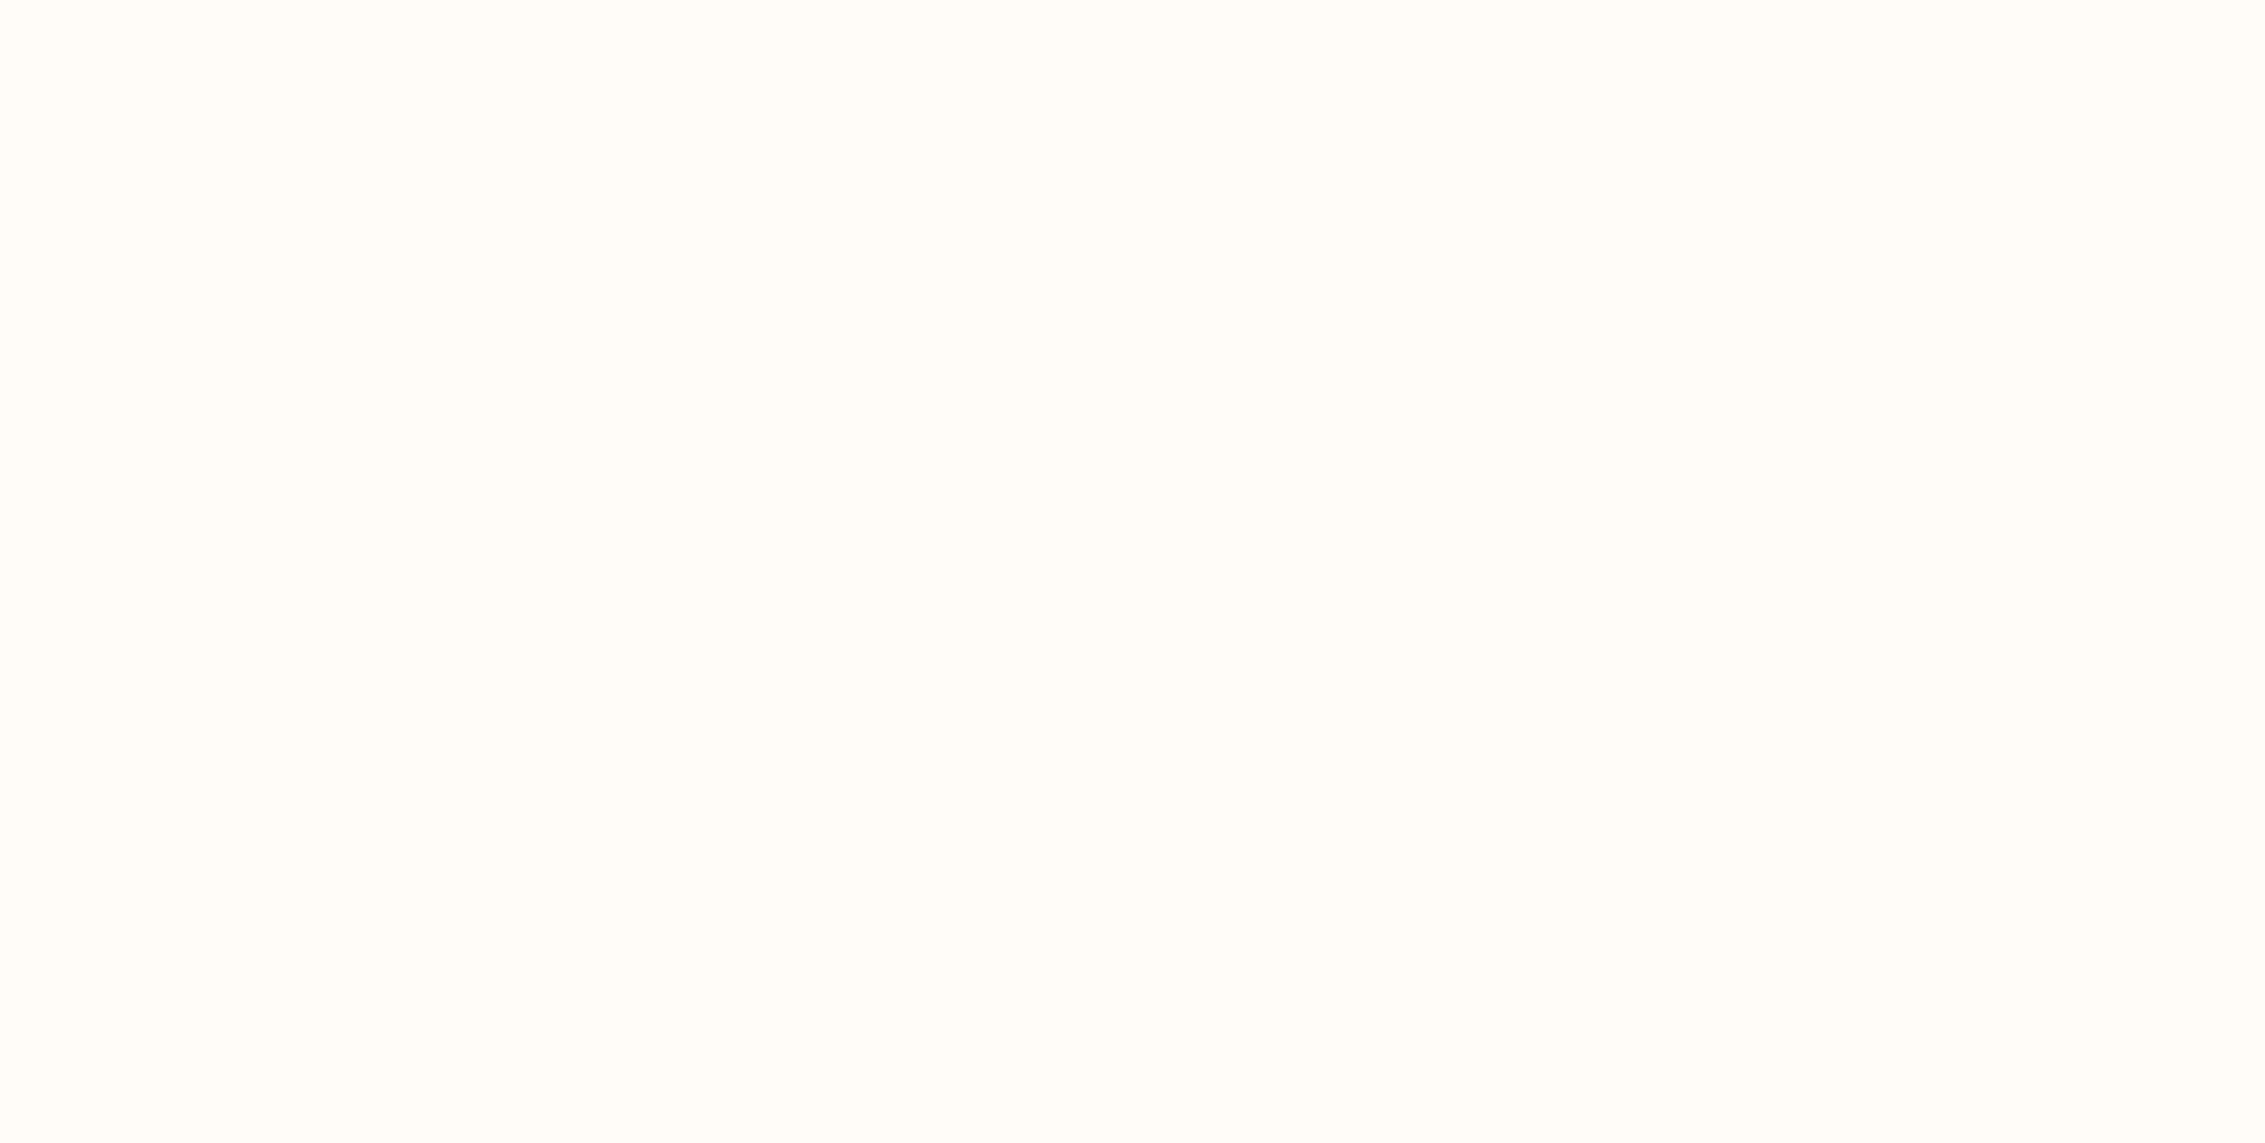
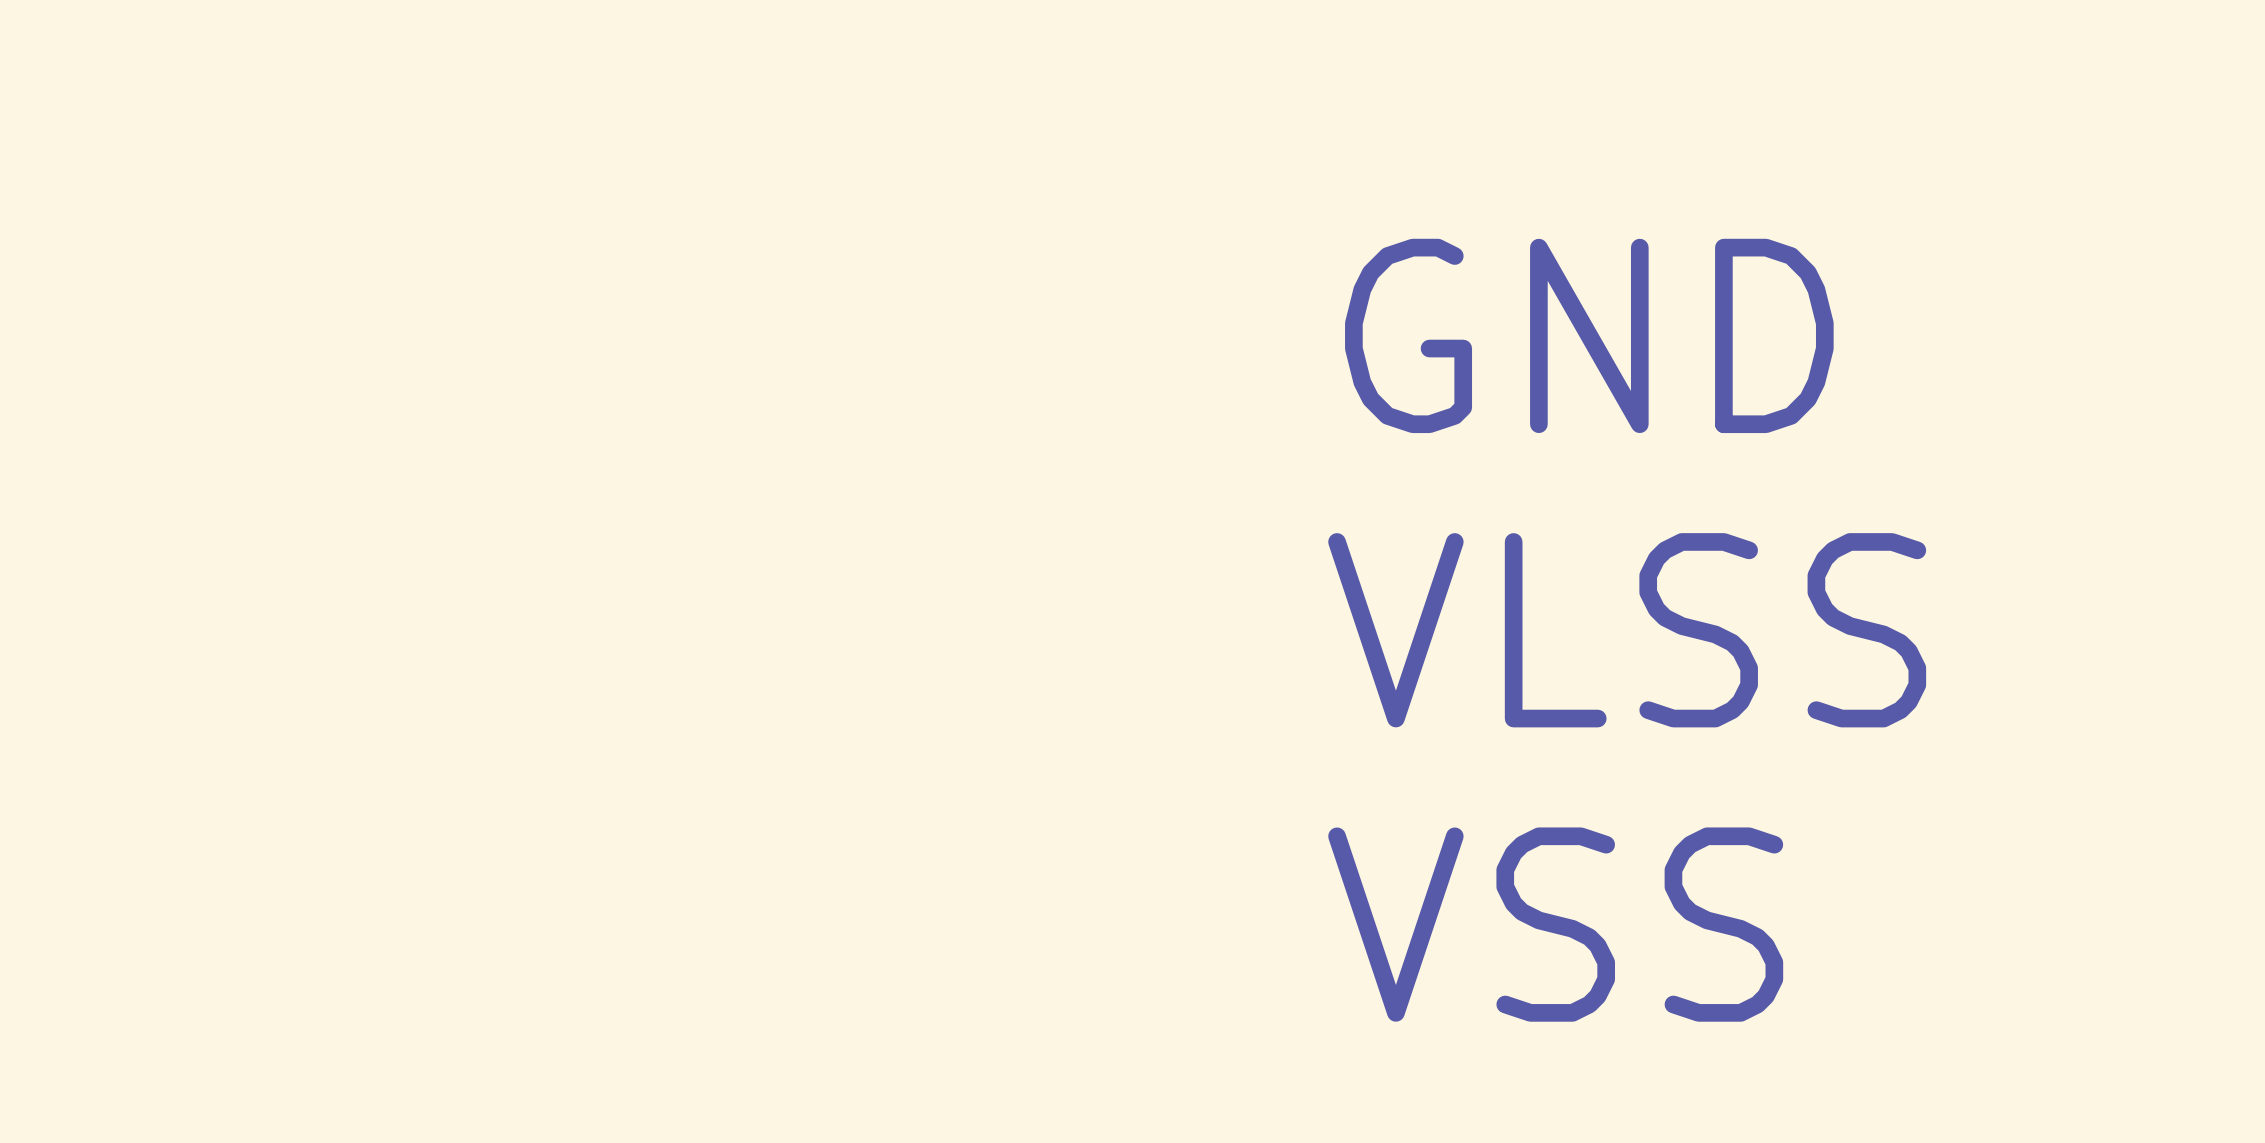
text: none -> GND (1589, 335)
text: none -> VLSS (1627, 630)
text: none -> VSS (1555, 924)

